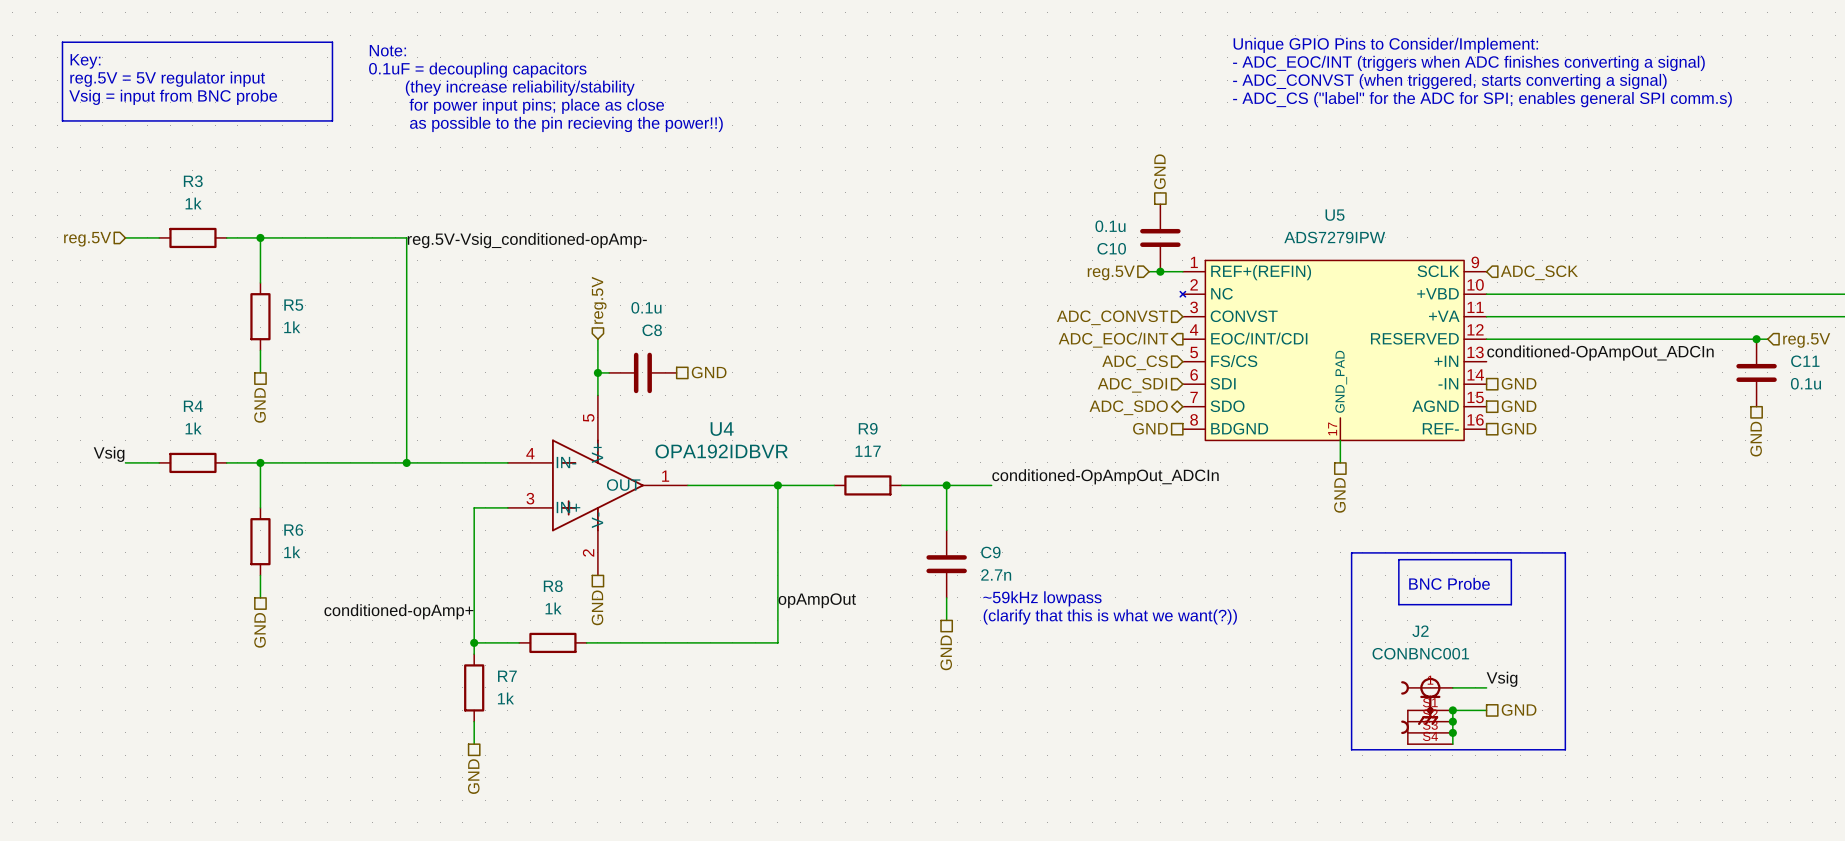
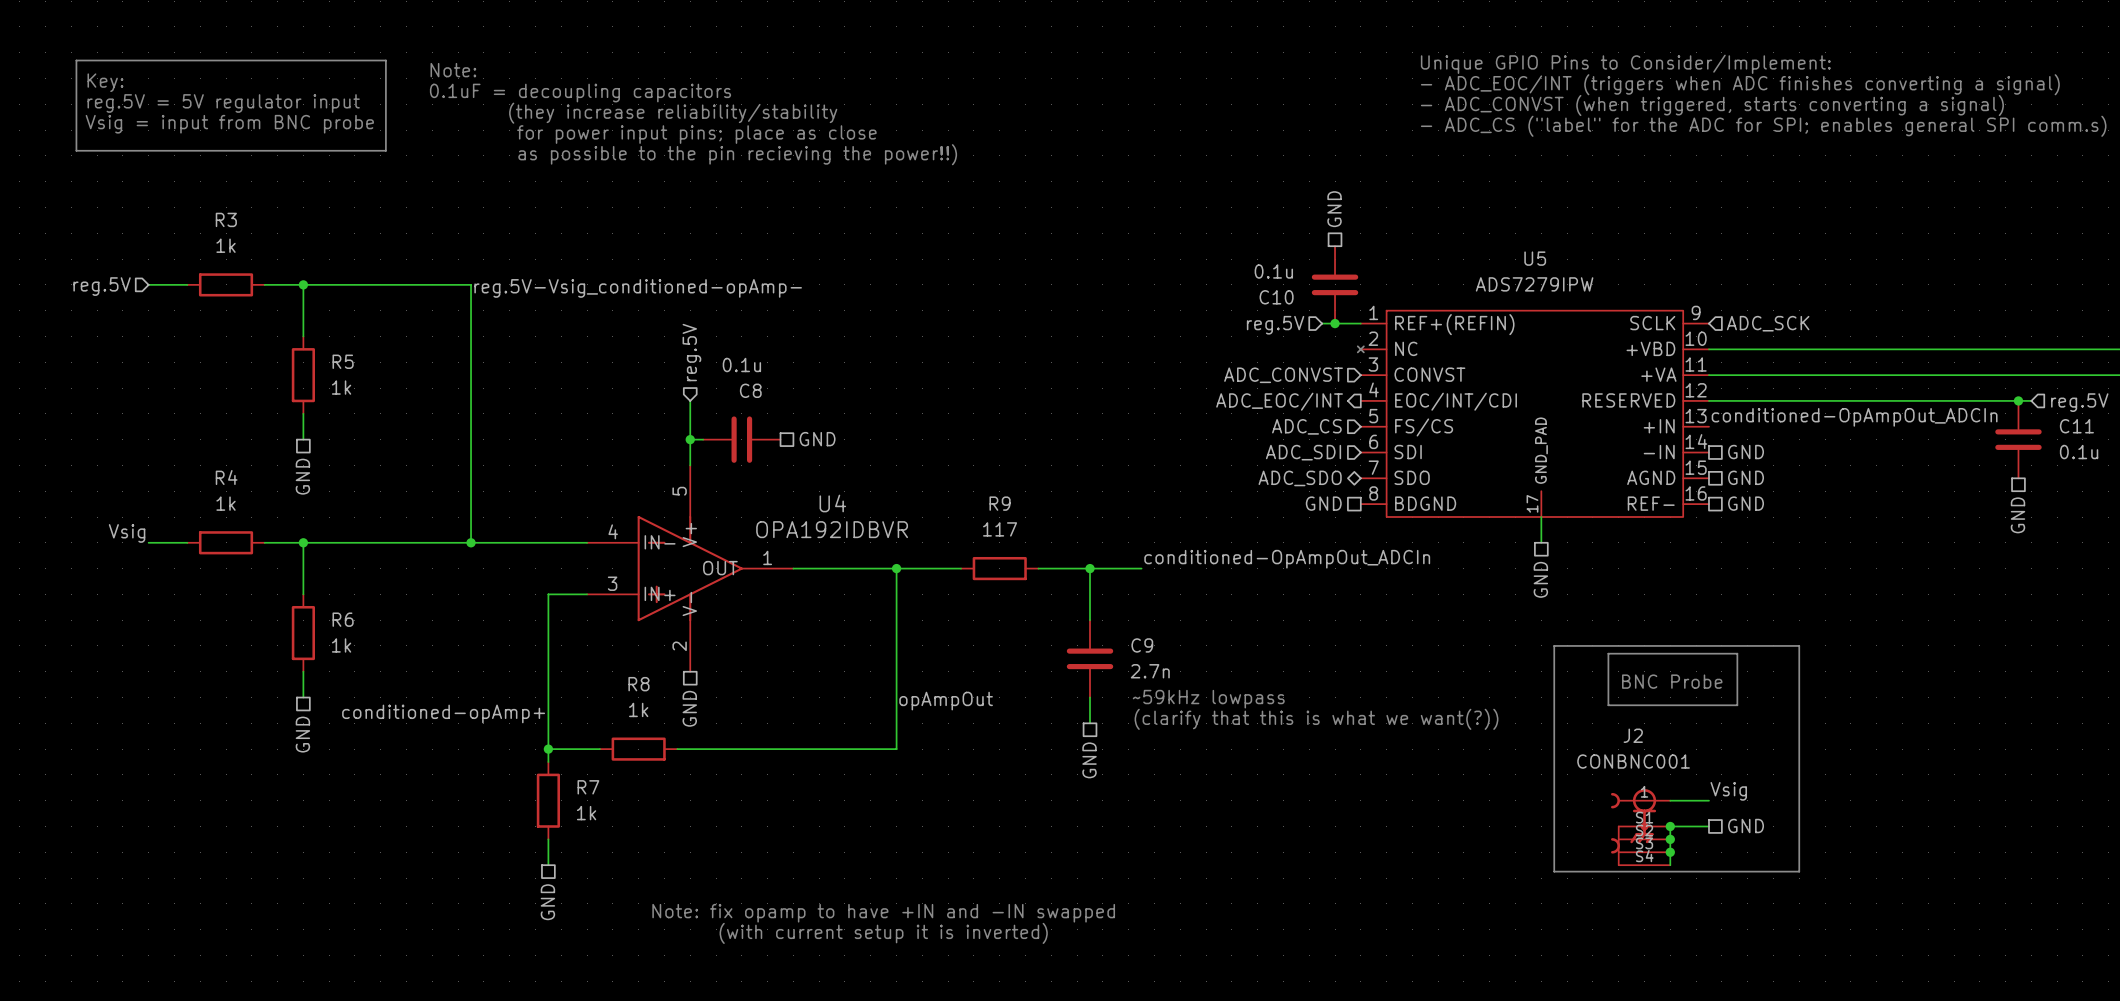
text: none -> Note: fix opamp to have +IN and -IN swapped (883, 913)
text: none -> (with current setup it is inverted) (883, 933)

